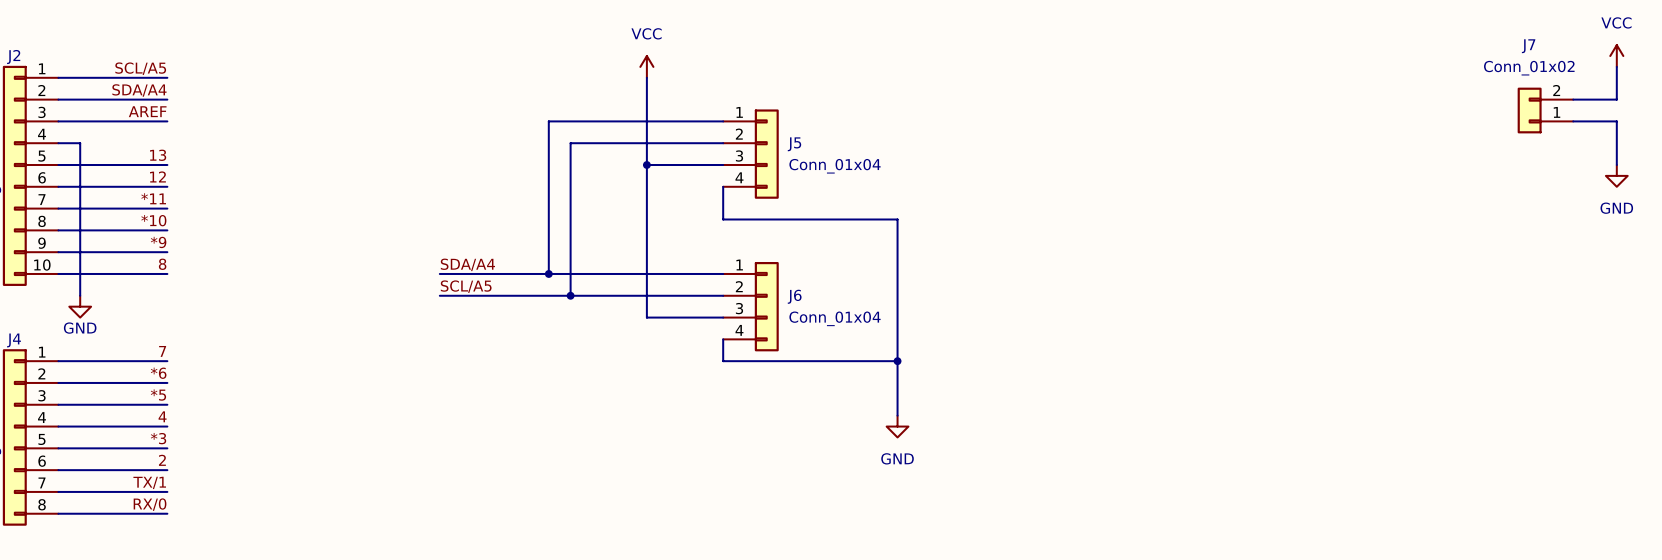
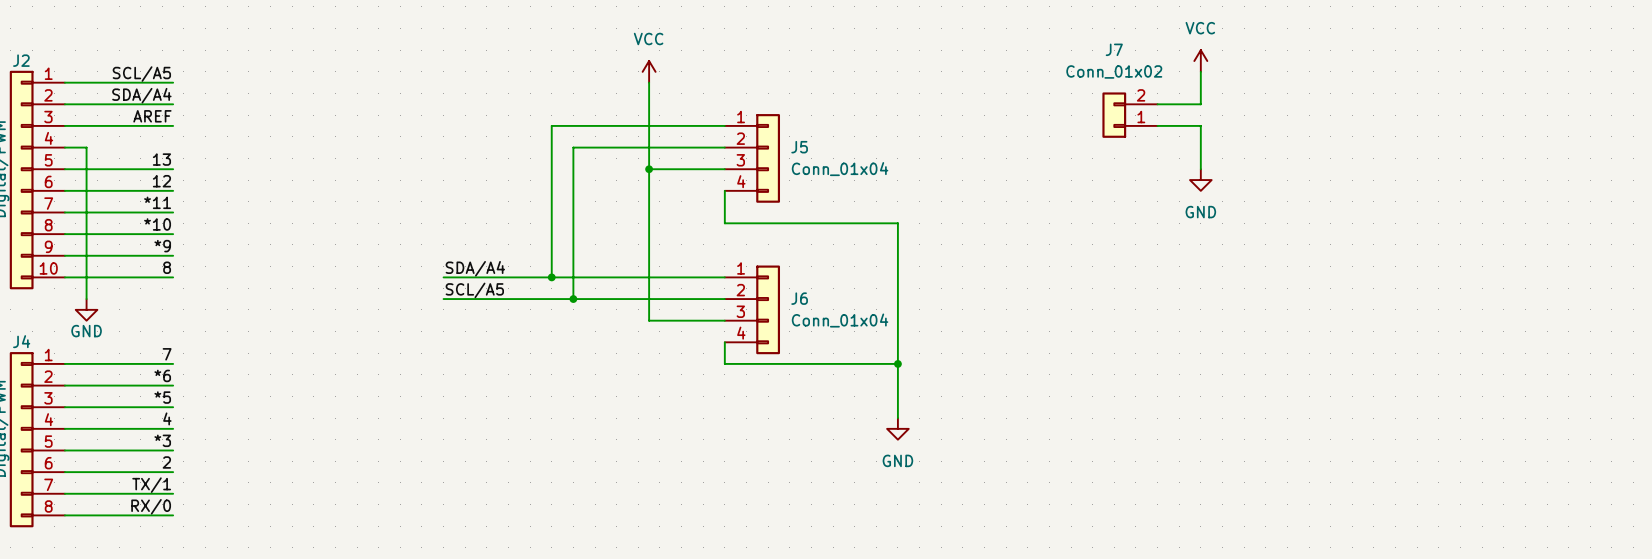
power symbol: none -> VCC (1200, 61)
power symbol: VCC (1616, 56) -> none
wire: none -> (1200, 71) (1200, 104) (1157, 104)
wire: (1616, 66) (1616, 99) (1573, 99) -> none
J7 position: (1545, 110) -> (1129, 115)
wire: none -> (1157, 125) (1200, 125) (1200, 169)
wire: (1573, 121) (1616, 121) (1616, 165) -> none
power symbol: none -> GND (1200, 180)
power symbol: GND (1616, 175) -> none

